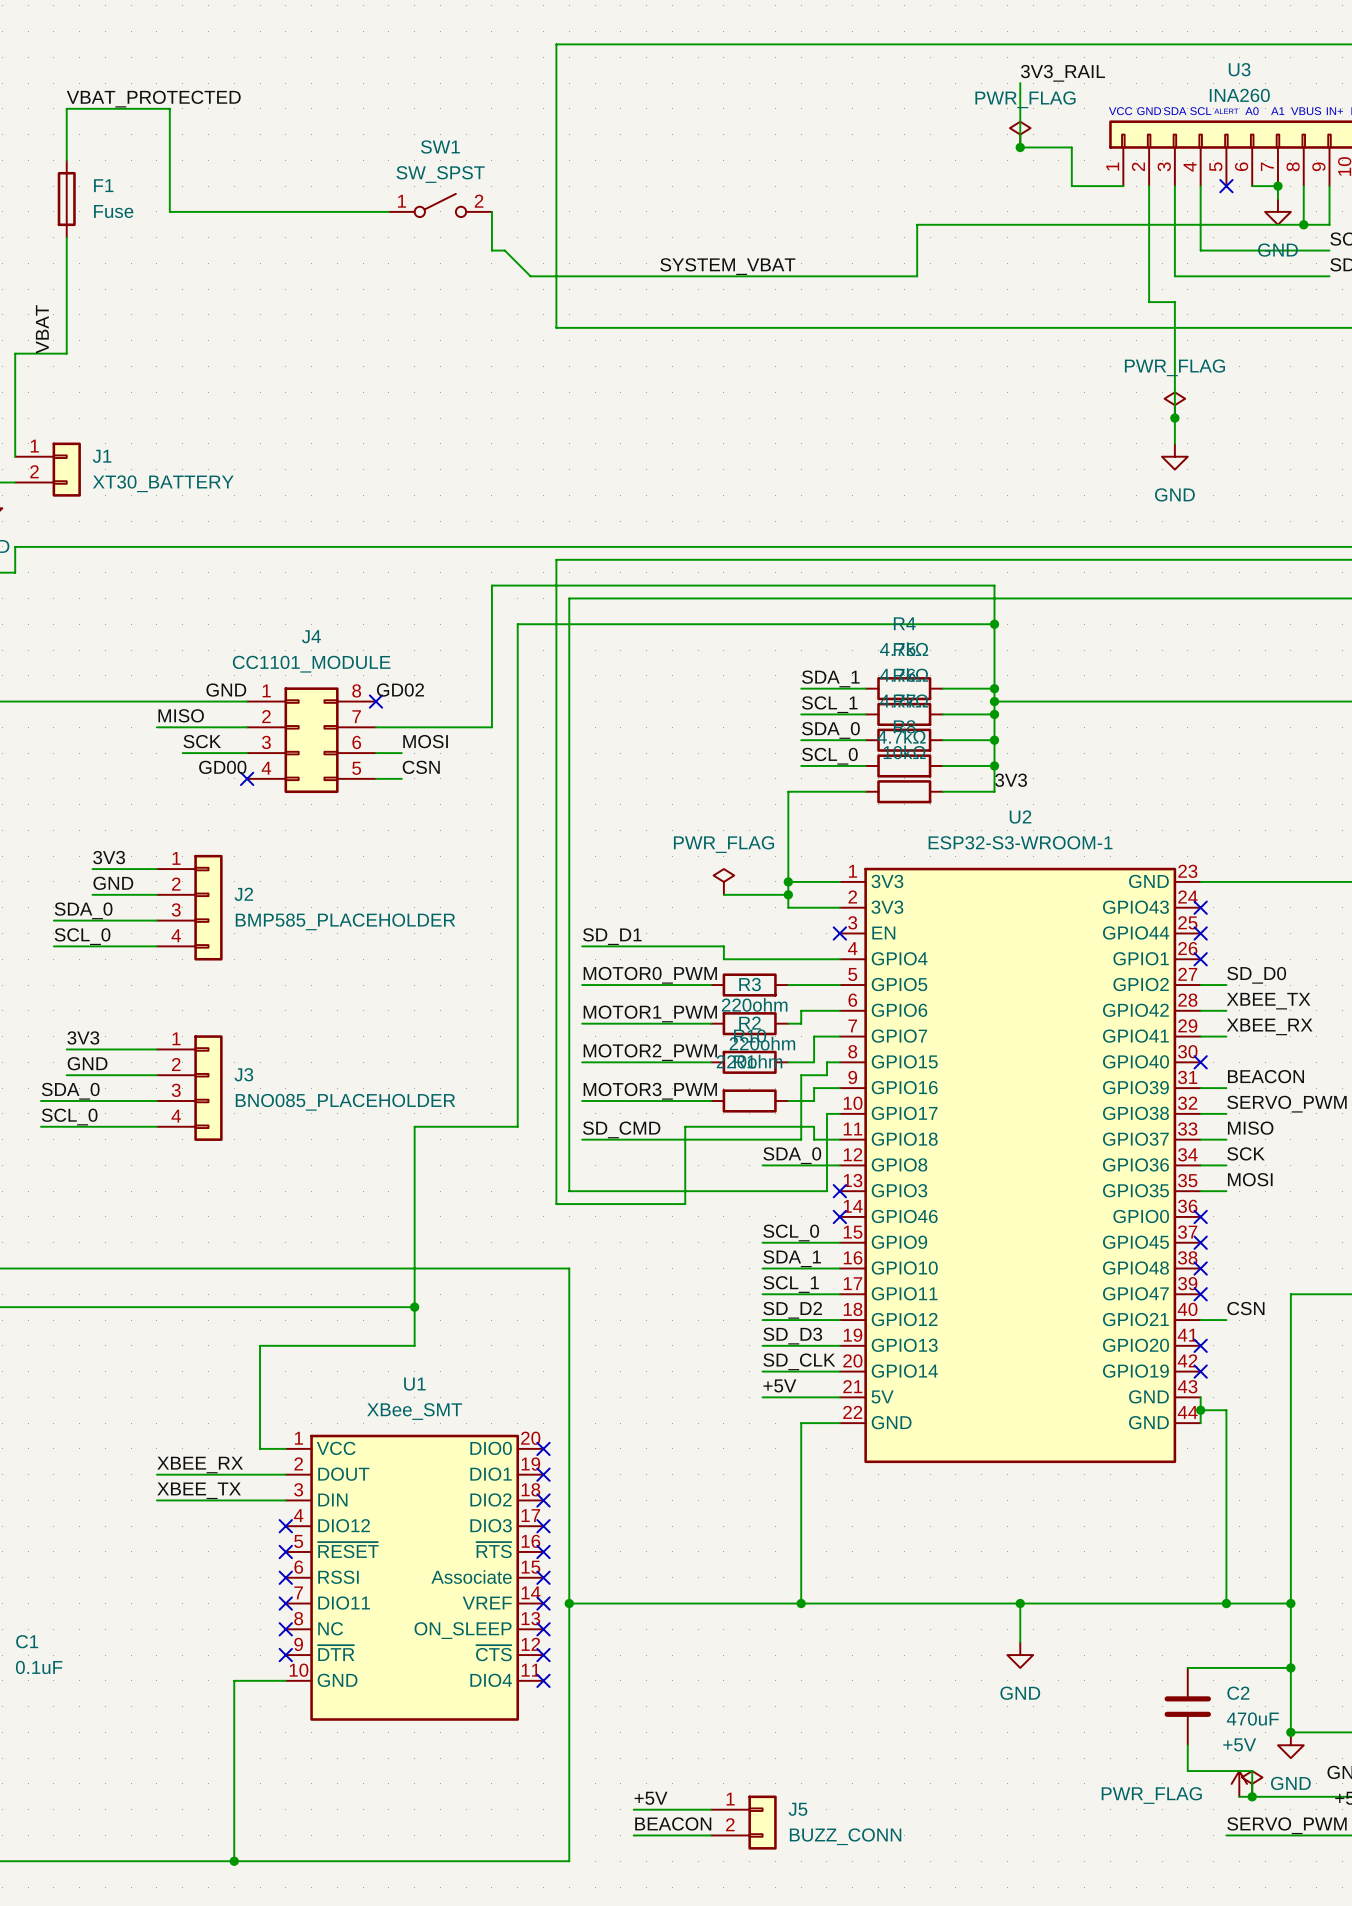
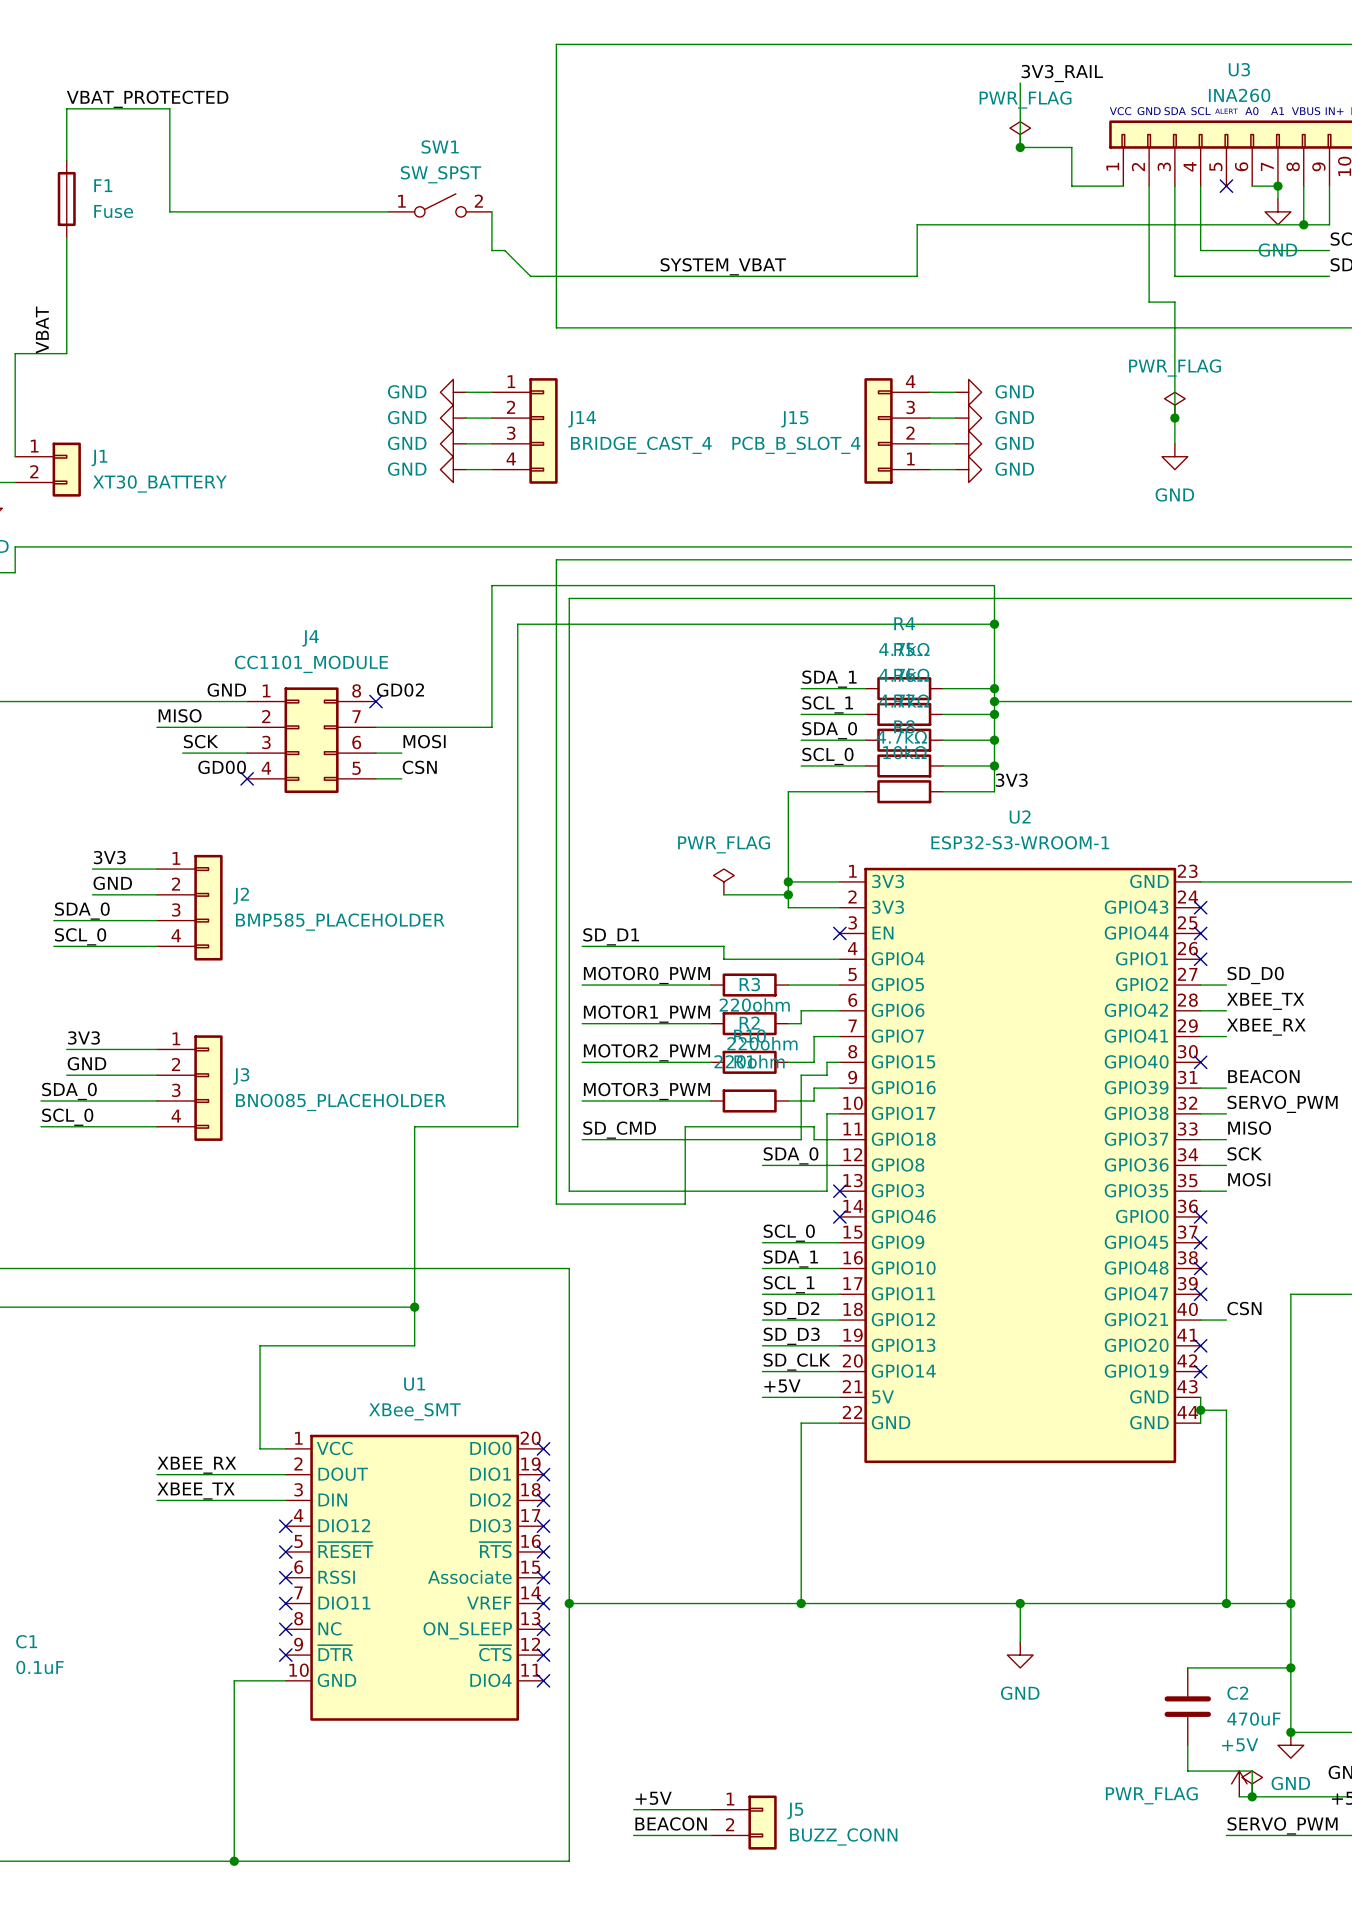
power symbol: none -> GND (453, 392)
wire: none -> (466, 392) (491, 392)
wire: none -> (930, 392) (955, 392)
power symbol: none -> GND (968, 392)
power symbol: none -> GND (453, 418)
wire: none -> (466, 418) (491, 418)
wire: none -> (930, 418) (955, 418)
power symbol: none -> GND (968, 418)
J14: none -> BRIDGE_CAST_4 (524, 430)
J15: none -> PCB_B_SLOT_4 (897, 430)
power symbol: none -> GND (453, 443)
wire: none -> (466, 443) (491, 443)
wire: none -> (930, 443) (955, 443)
power symbol: none -> GND (968, 443)
power symbol: none -> GND (453, 469)
wire: none -> (466, 469) (491, 469)
wire: none -> (930, 469) (955, 469)
power symbol: none -> GND (968, 469)

